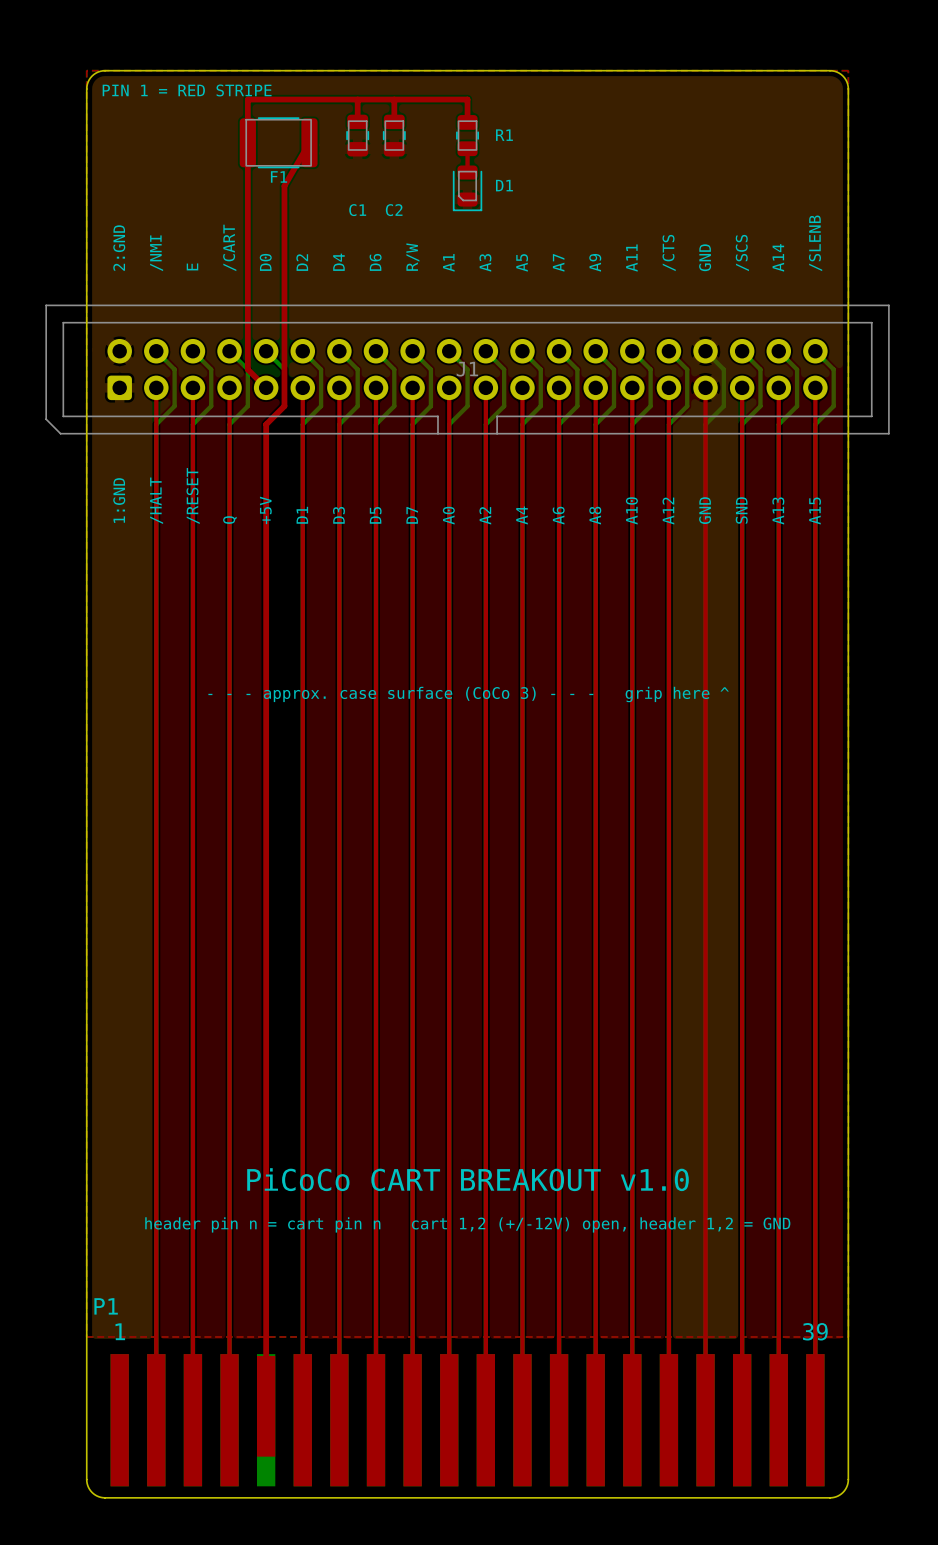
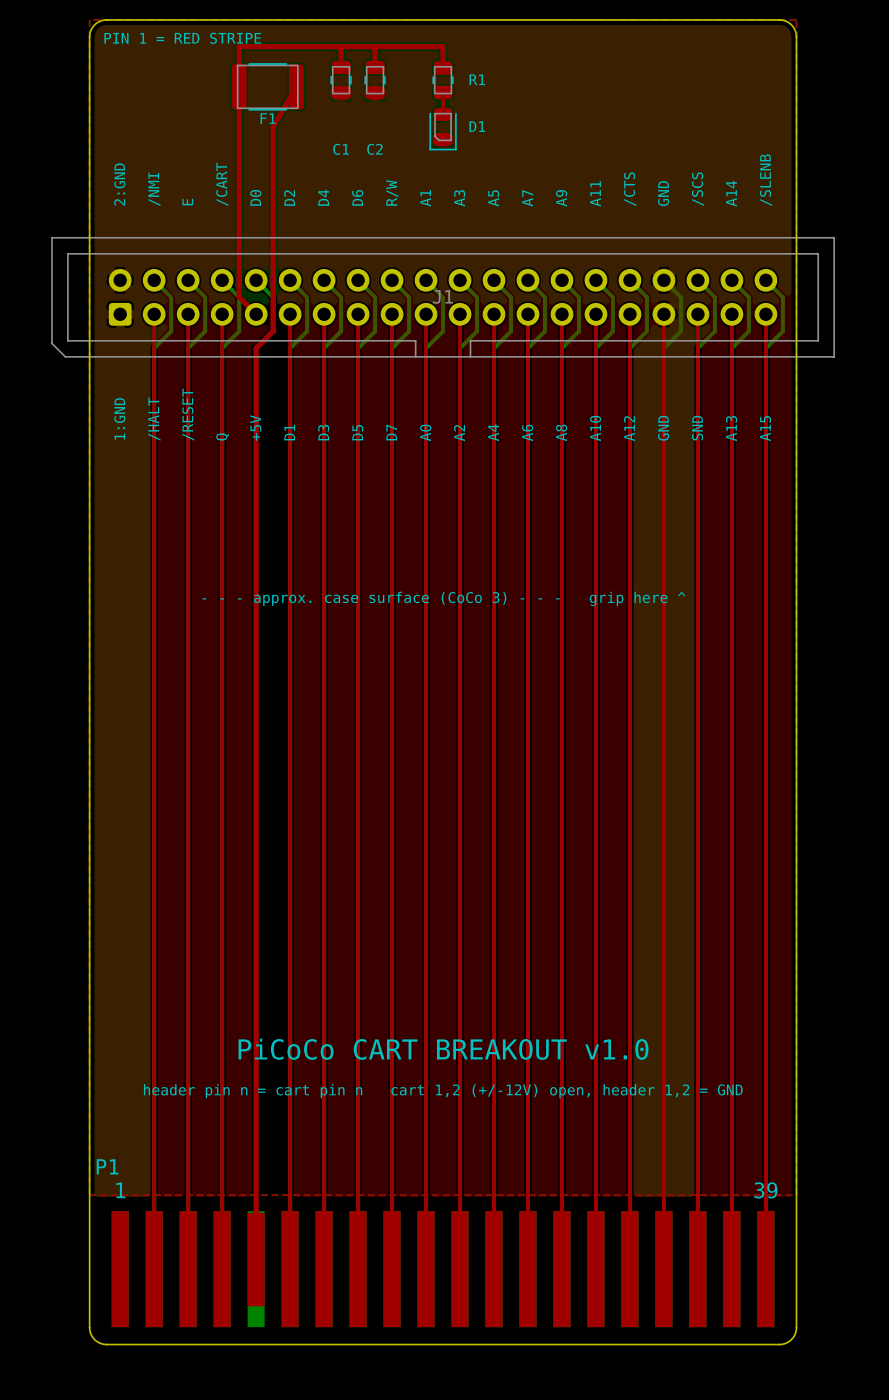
P1 footprint: [110, 1354, 825, 1487] -> [111, 1211, 775, 1328]

